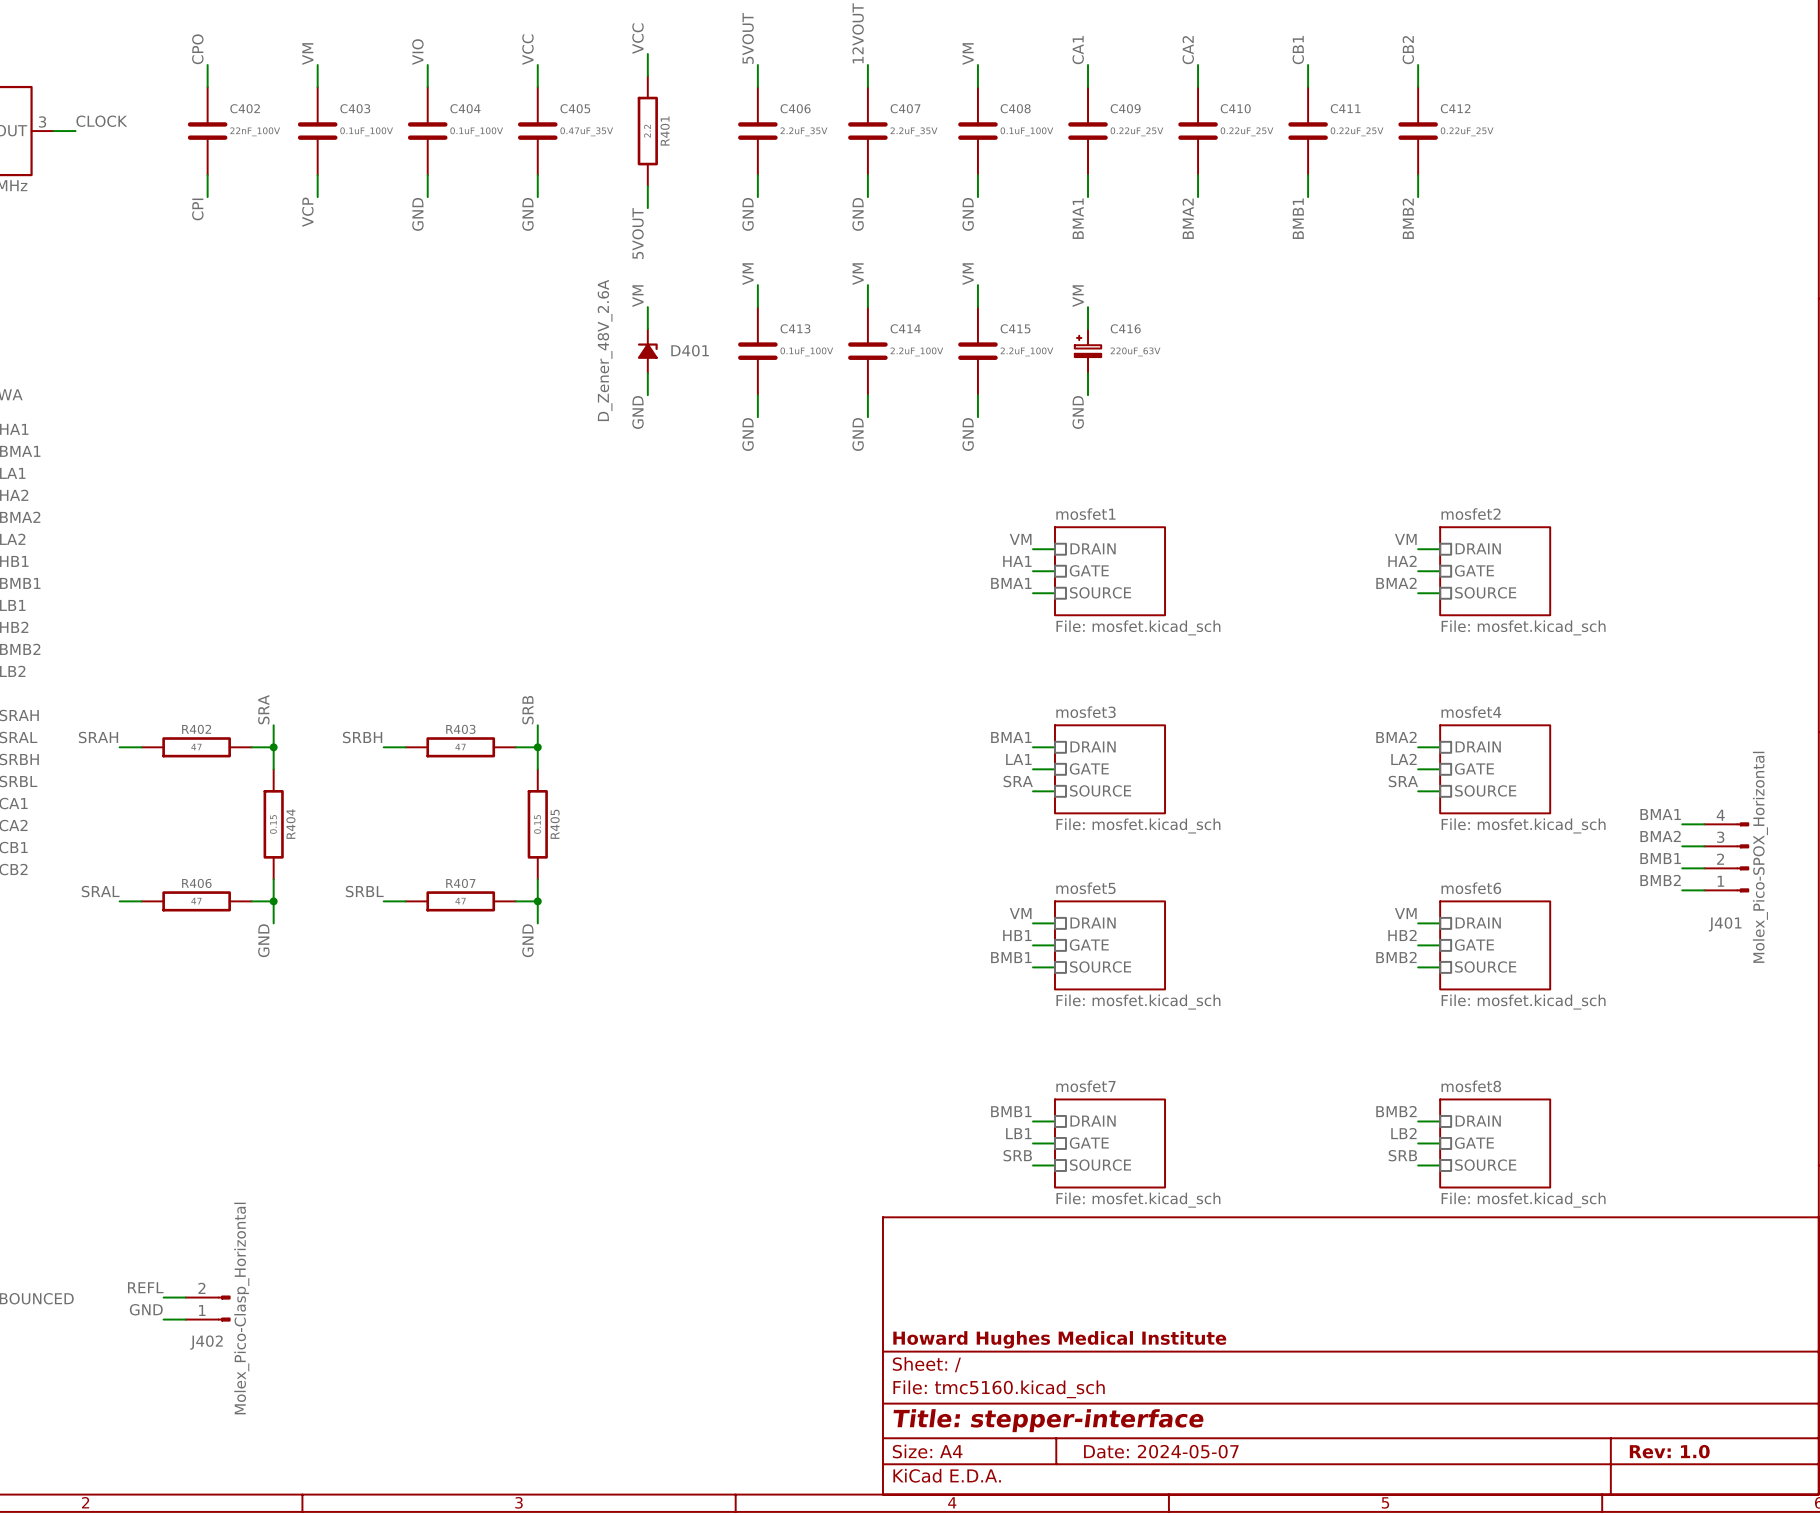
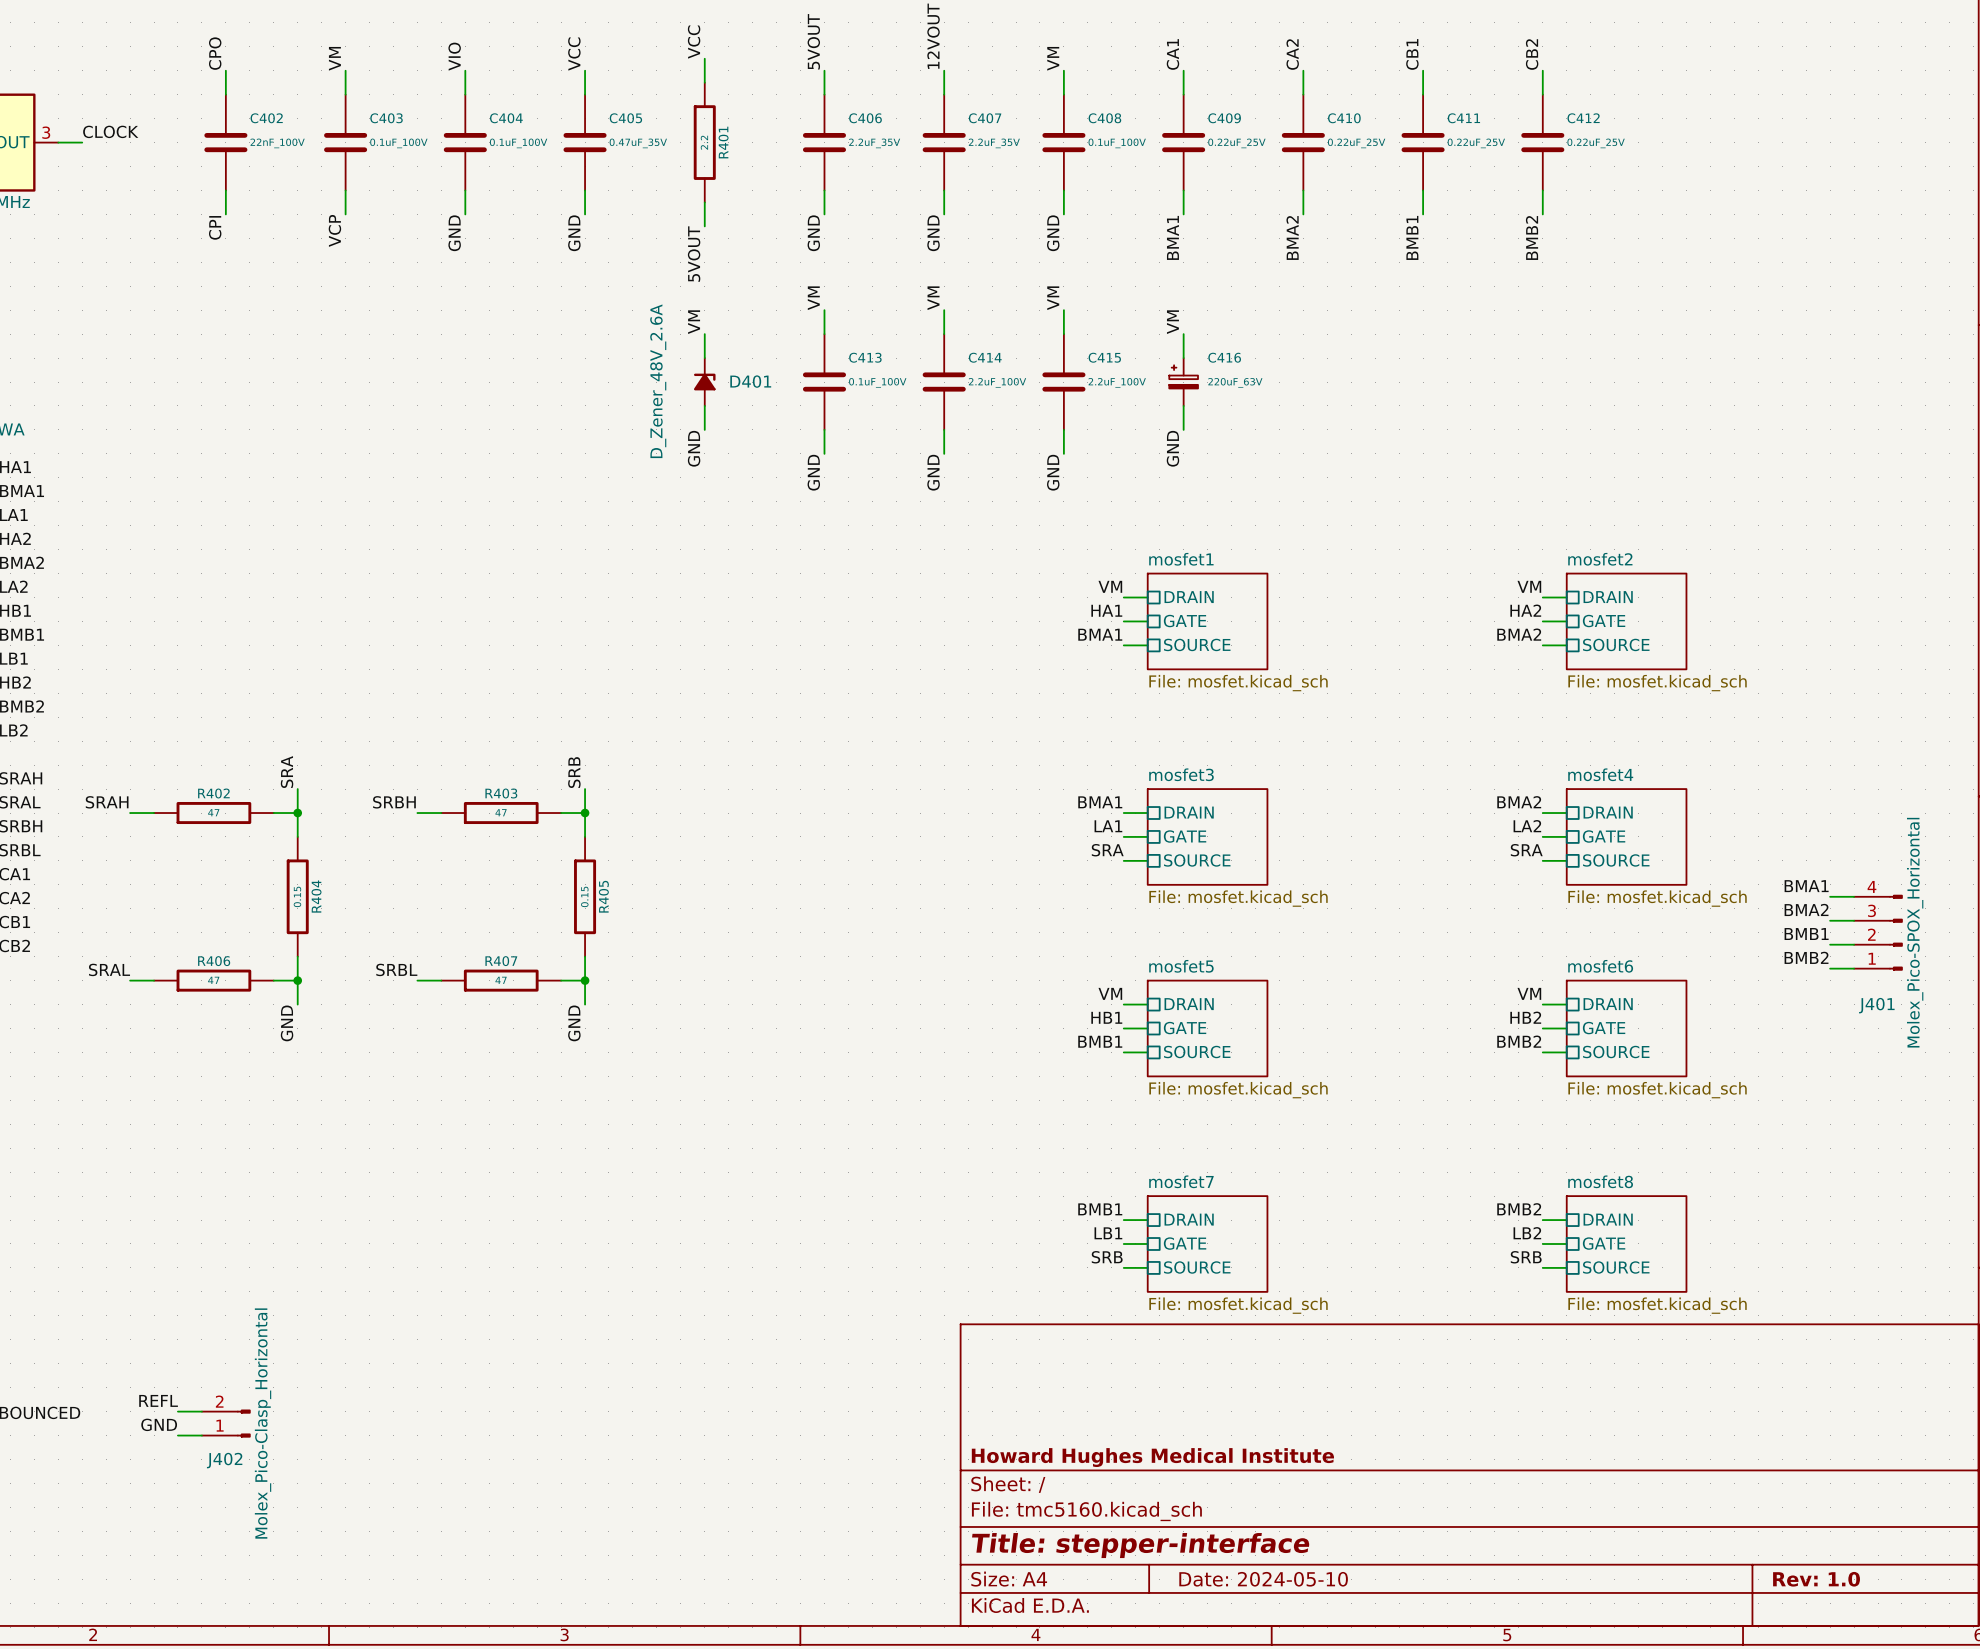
title block: Date: 2024-05-07 (1161, 1451) -> Date: 2024-05-10 (1263, 1579)

